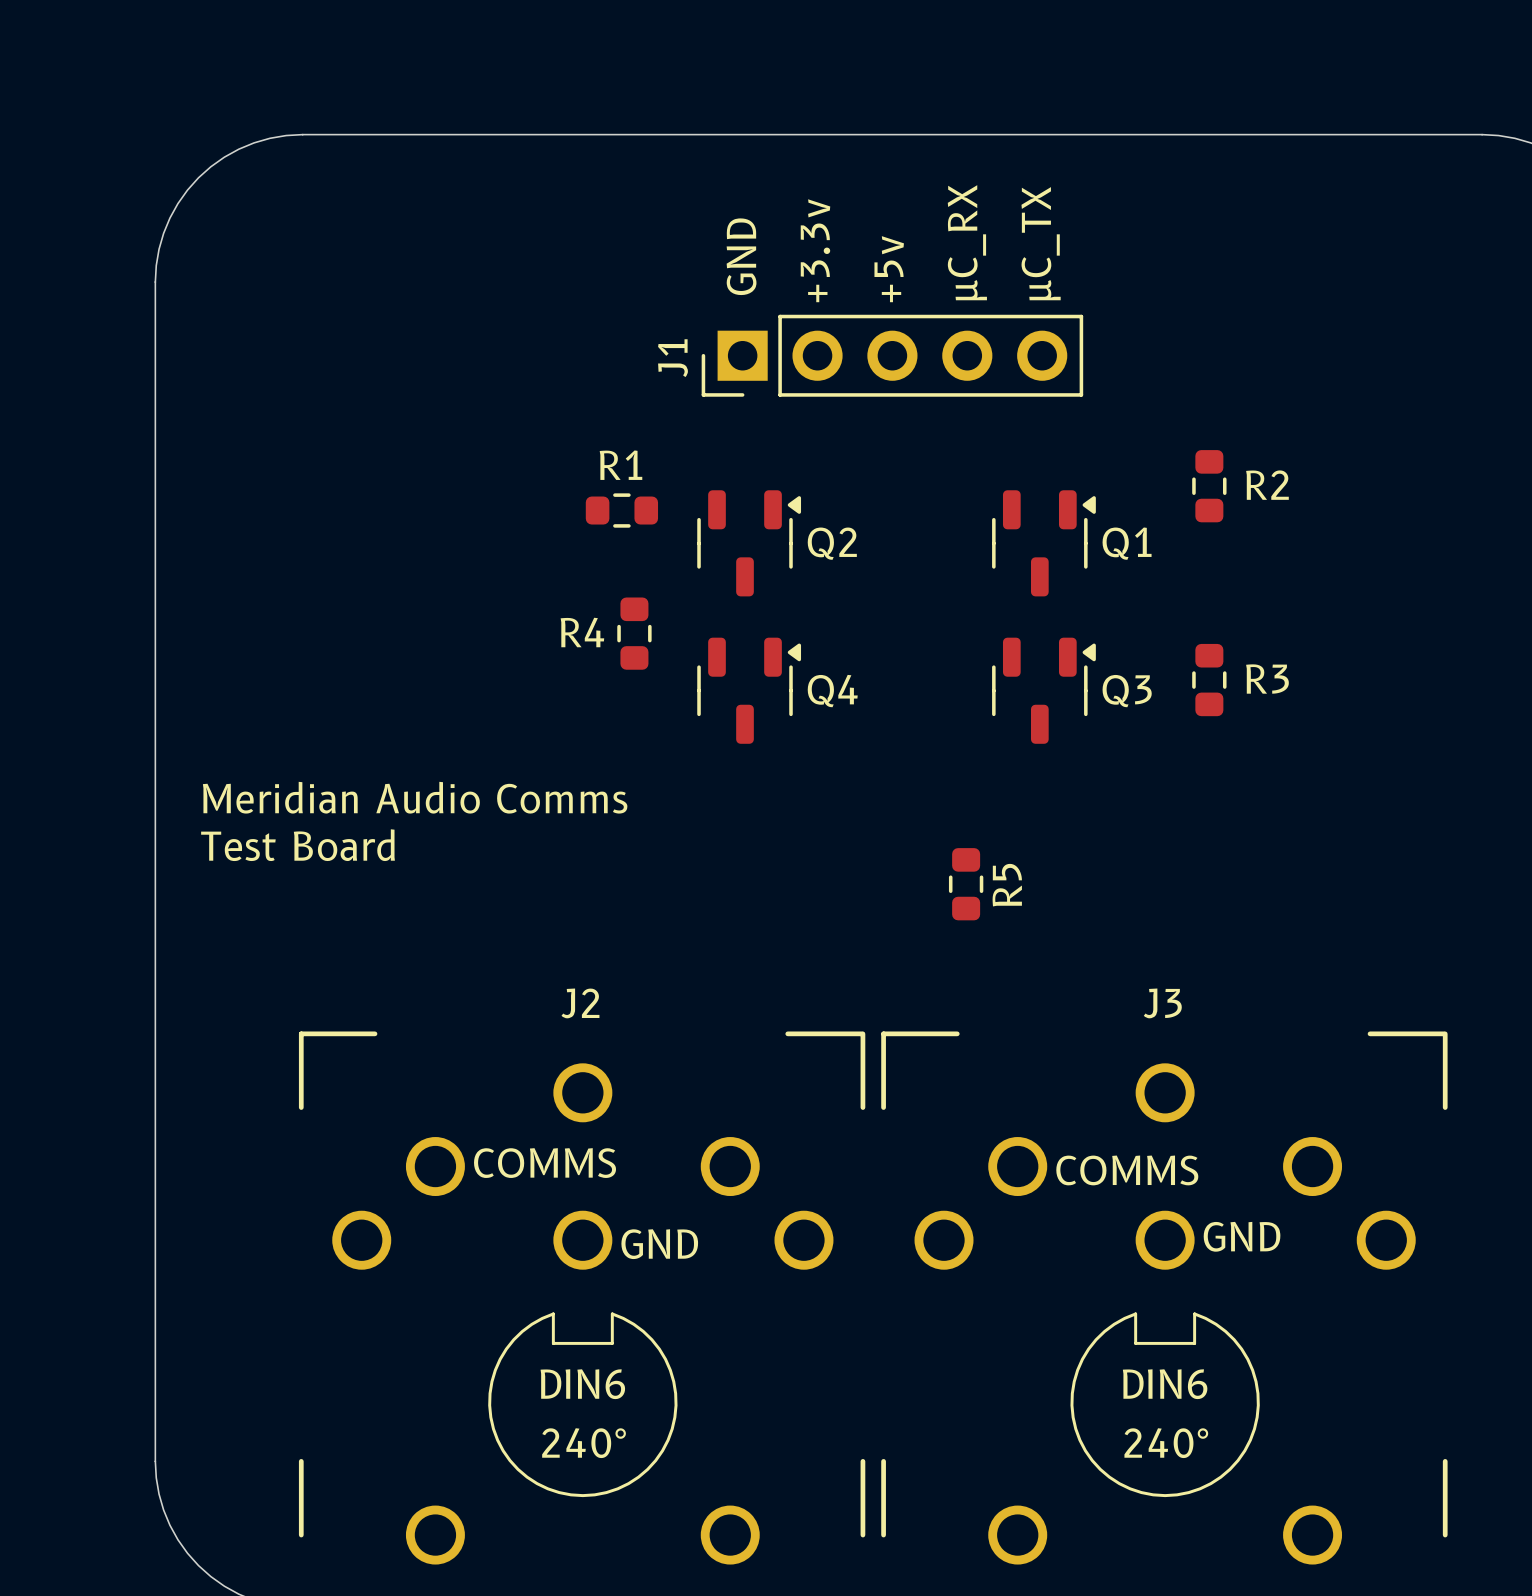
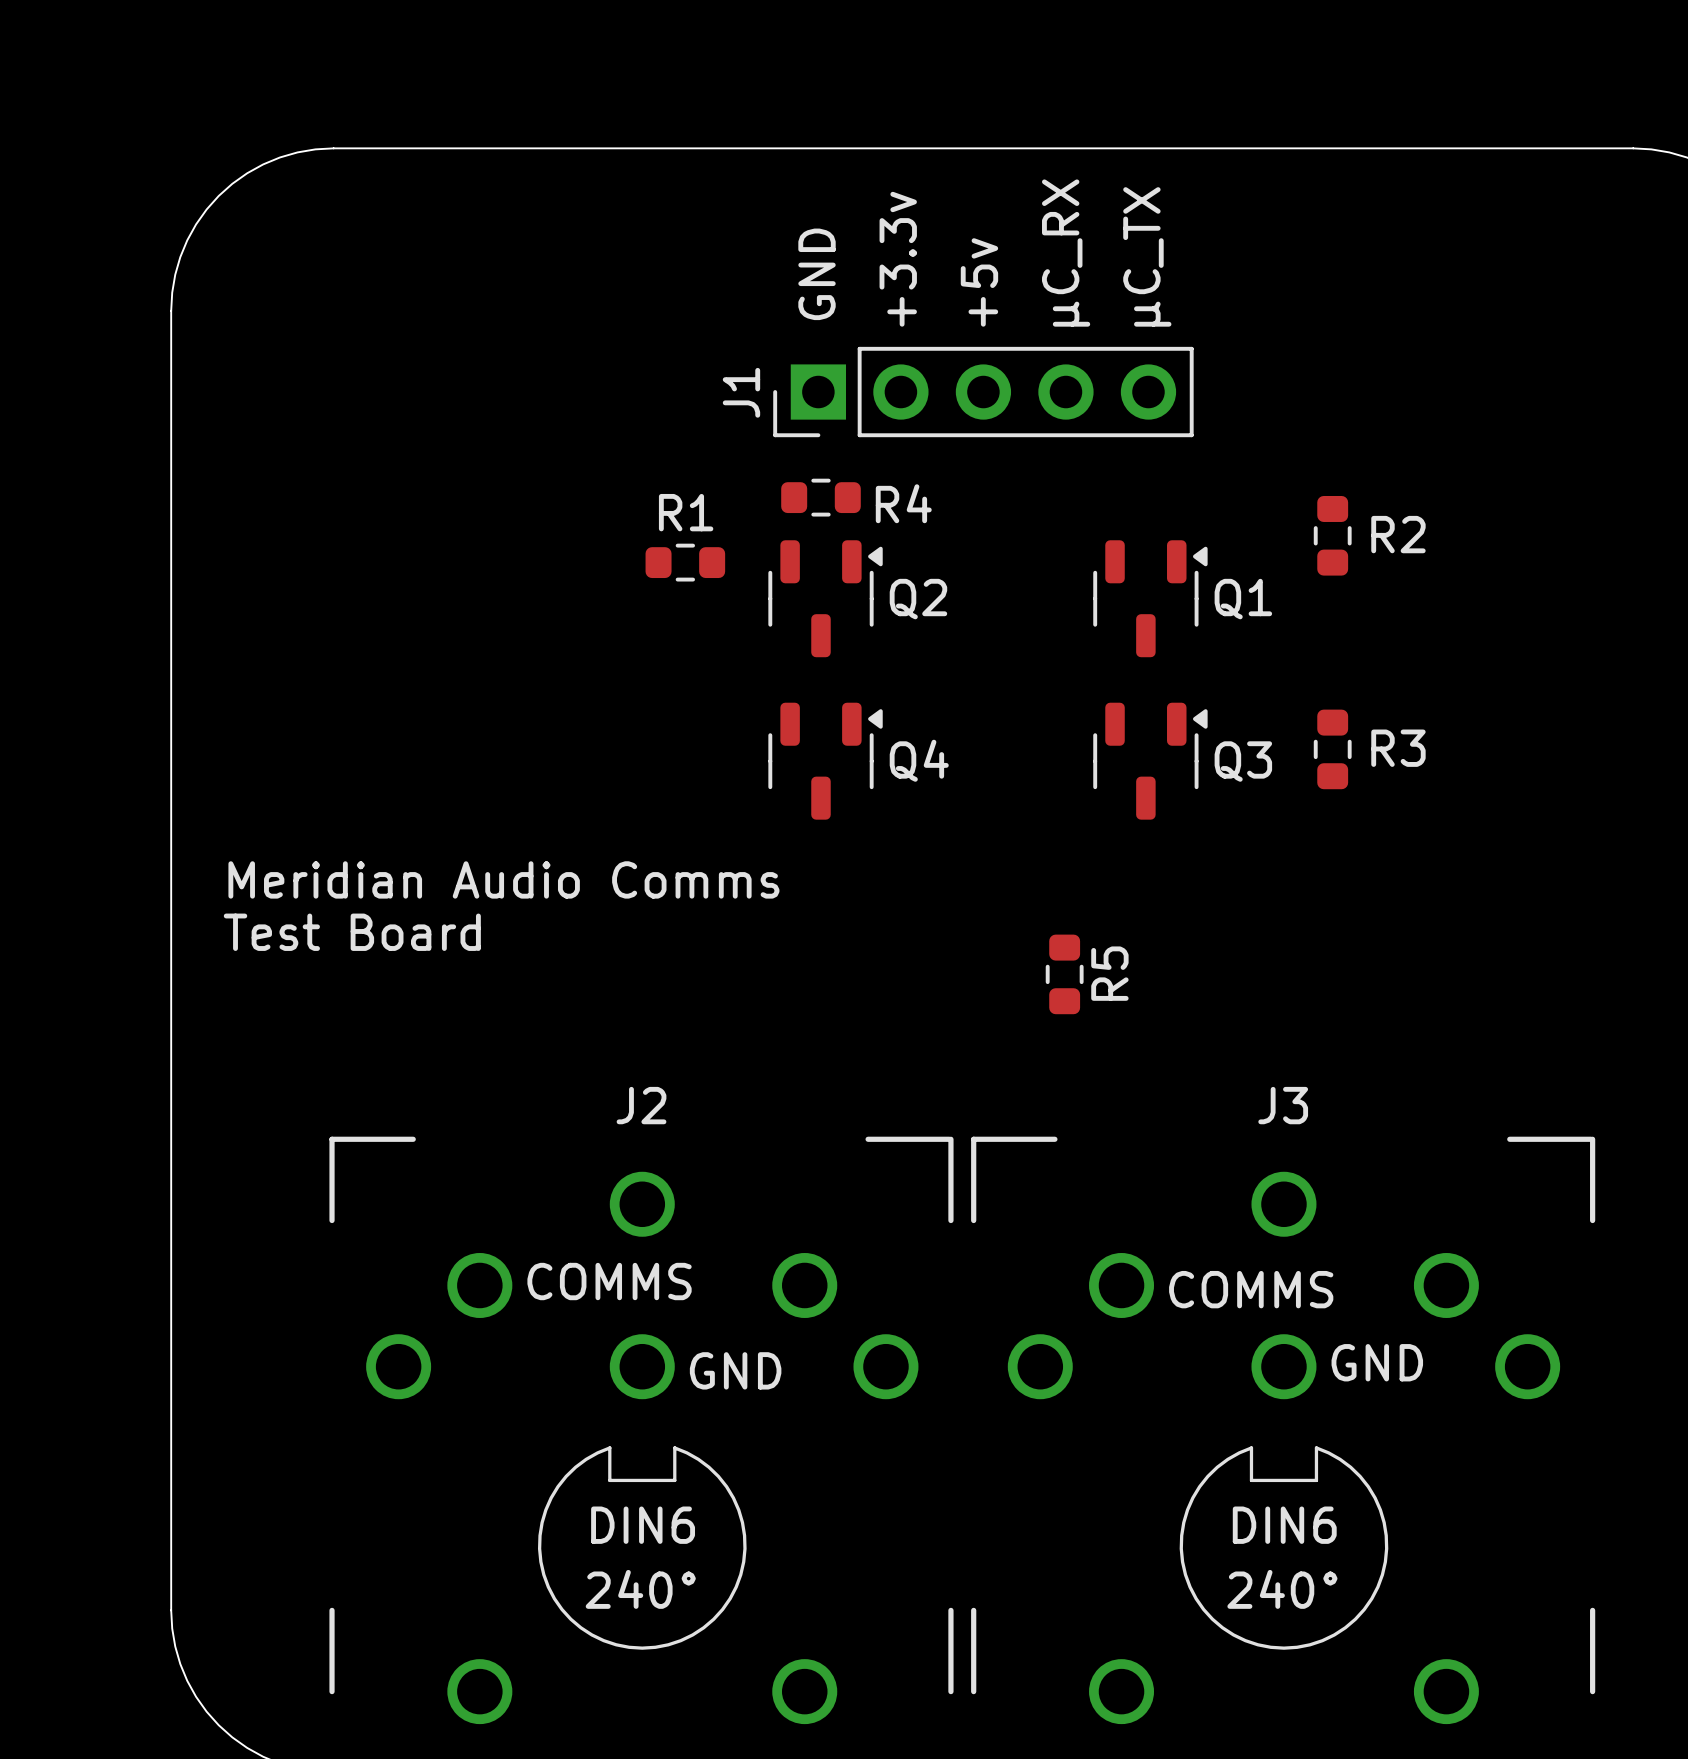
R4 name position: R4 (582, 632) -> R4 (903, 503)
R4 rotation: 0° (634, 633) -> 90° clockwise (820, 497)
R4 position: (634, 633) -> (820, 497)

